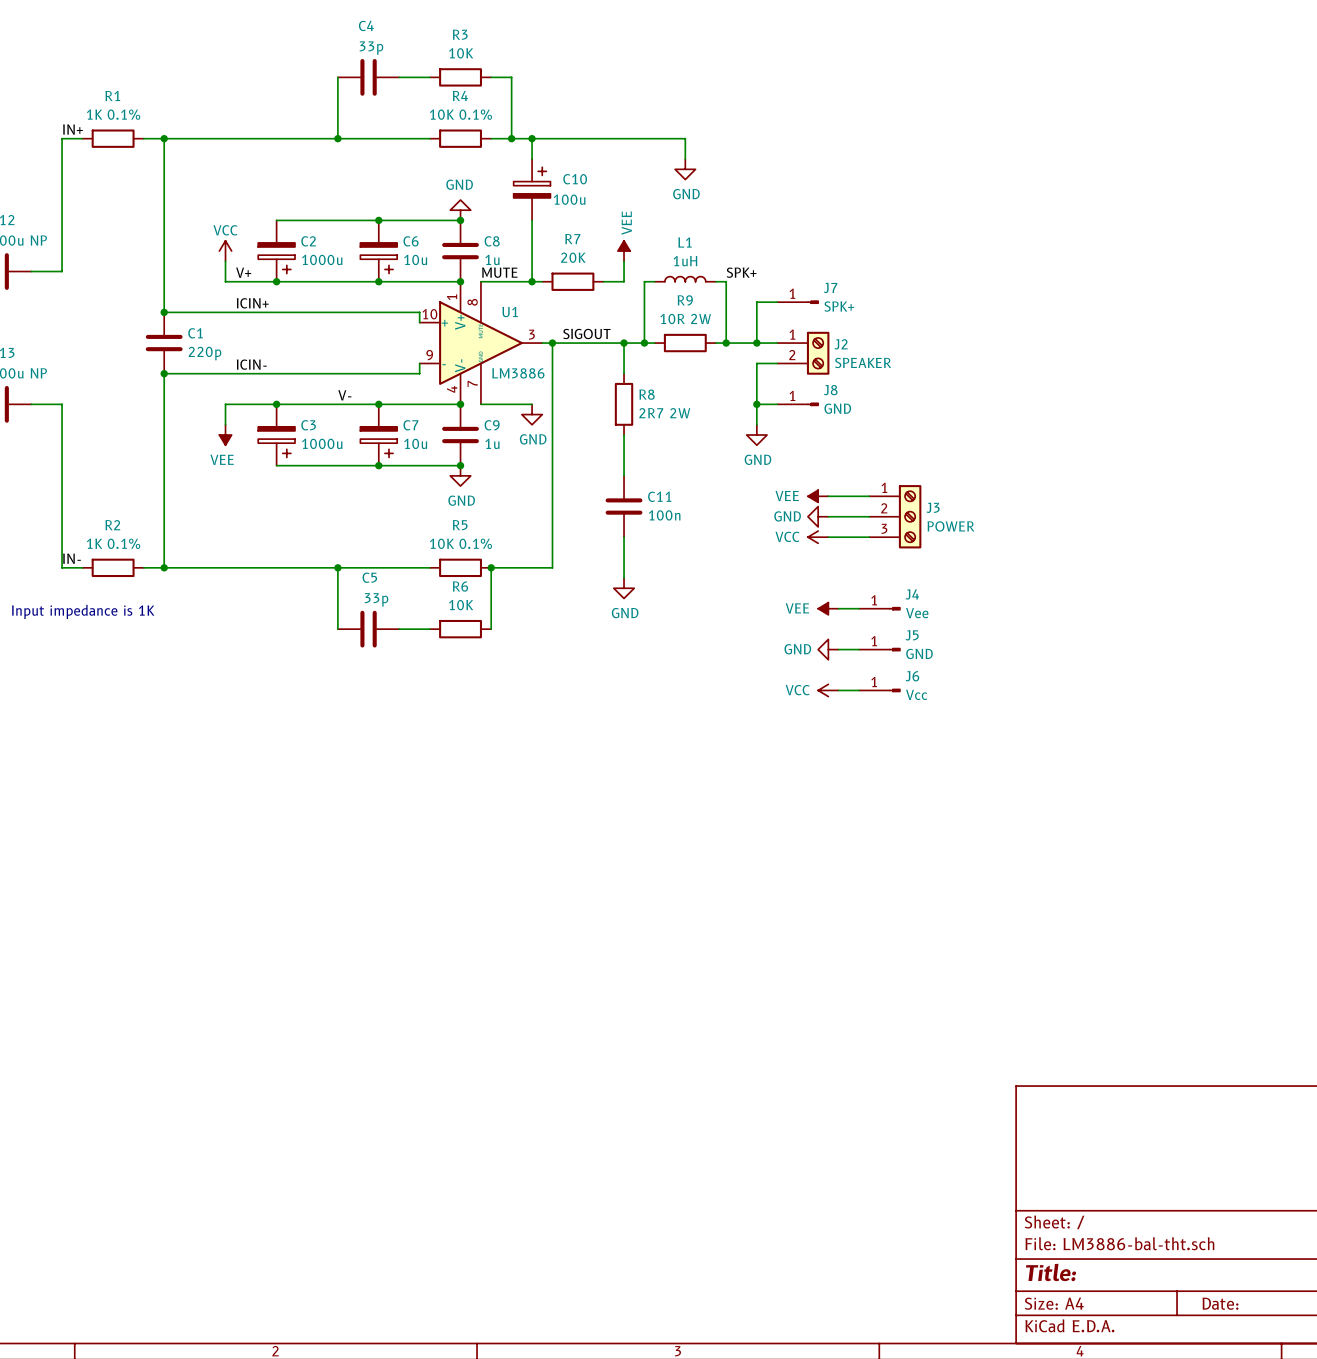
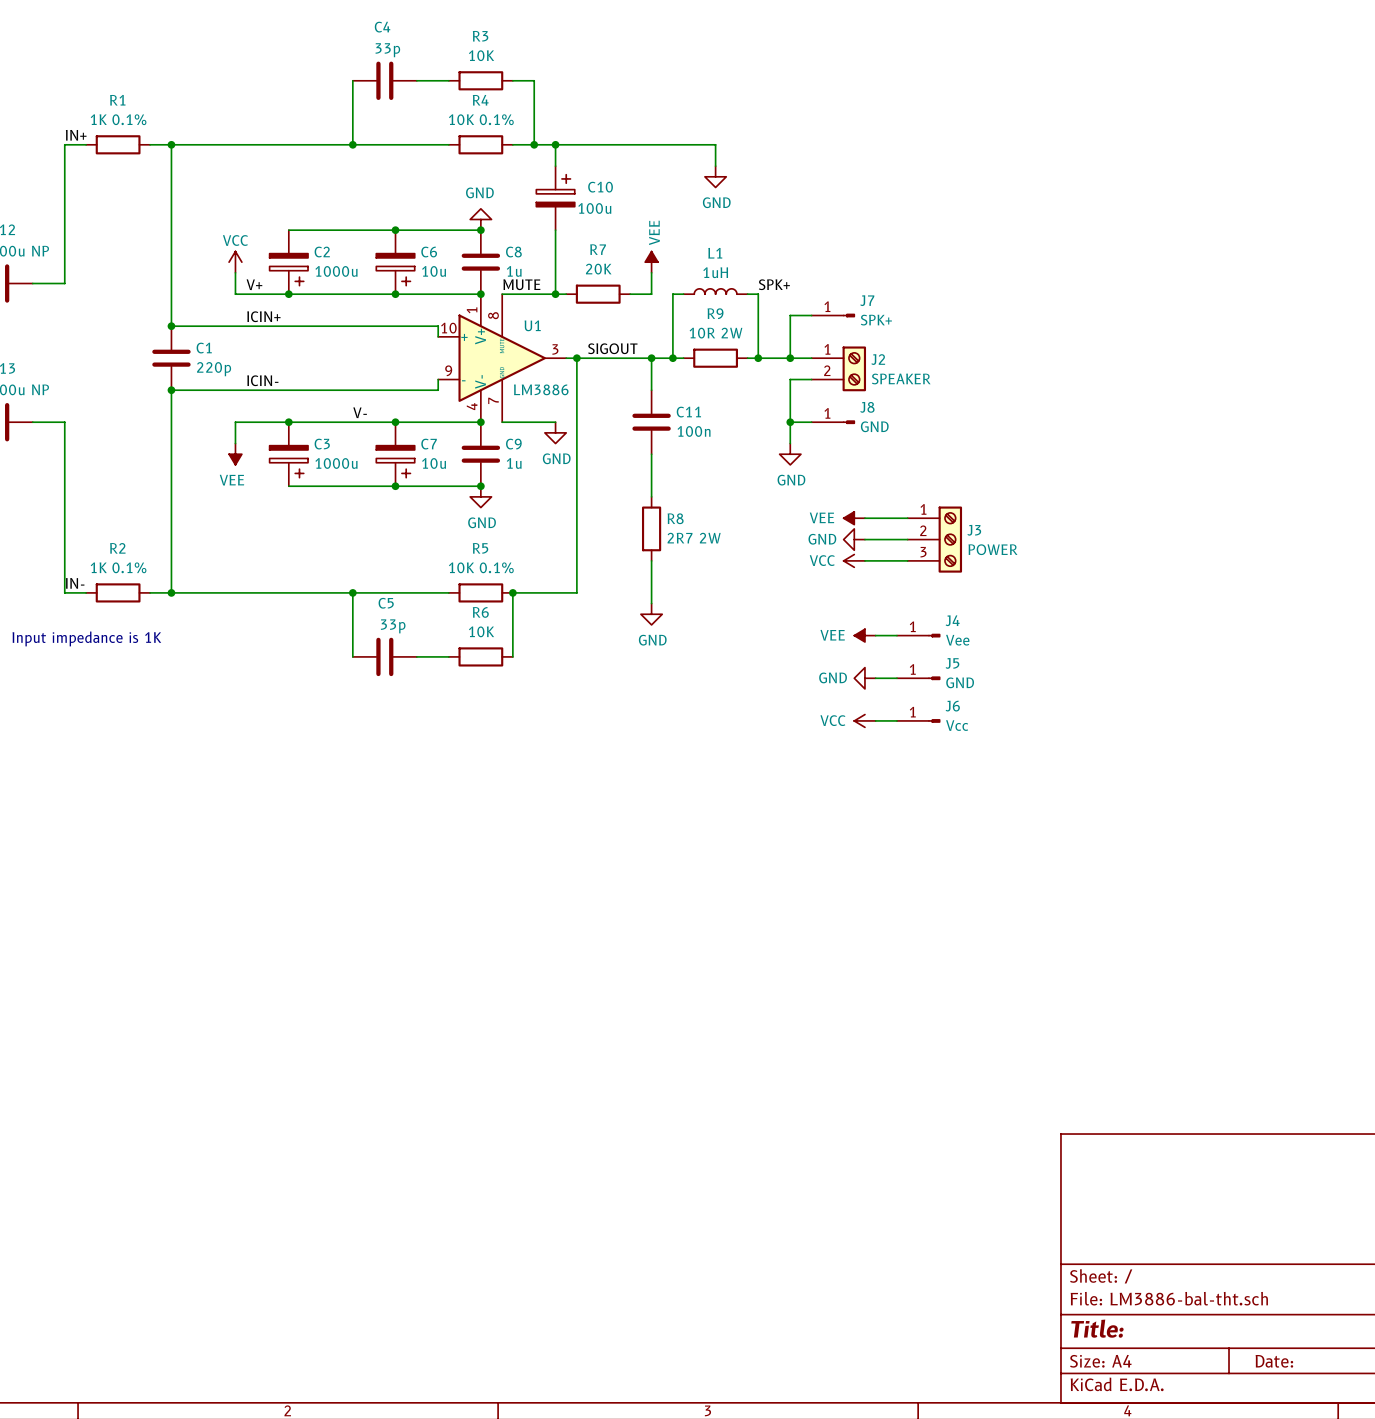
R8 position: (624, 404) -> (651, 528)
C11 position: (624, 506) -> (651, 422)

